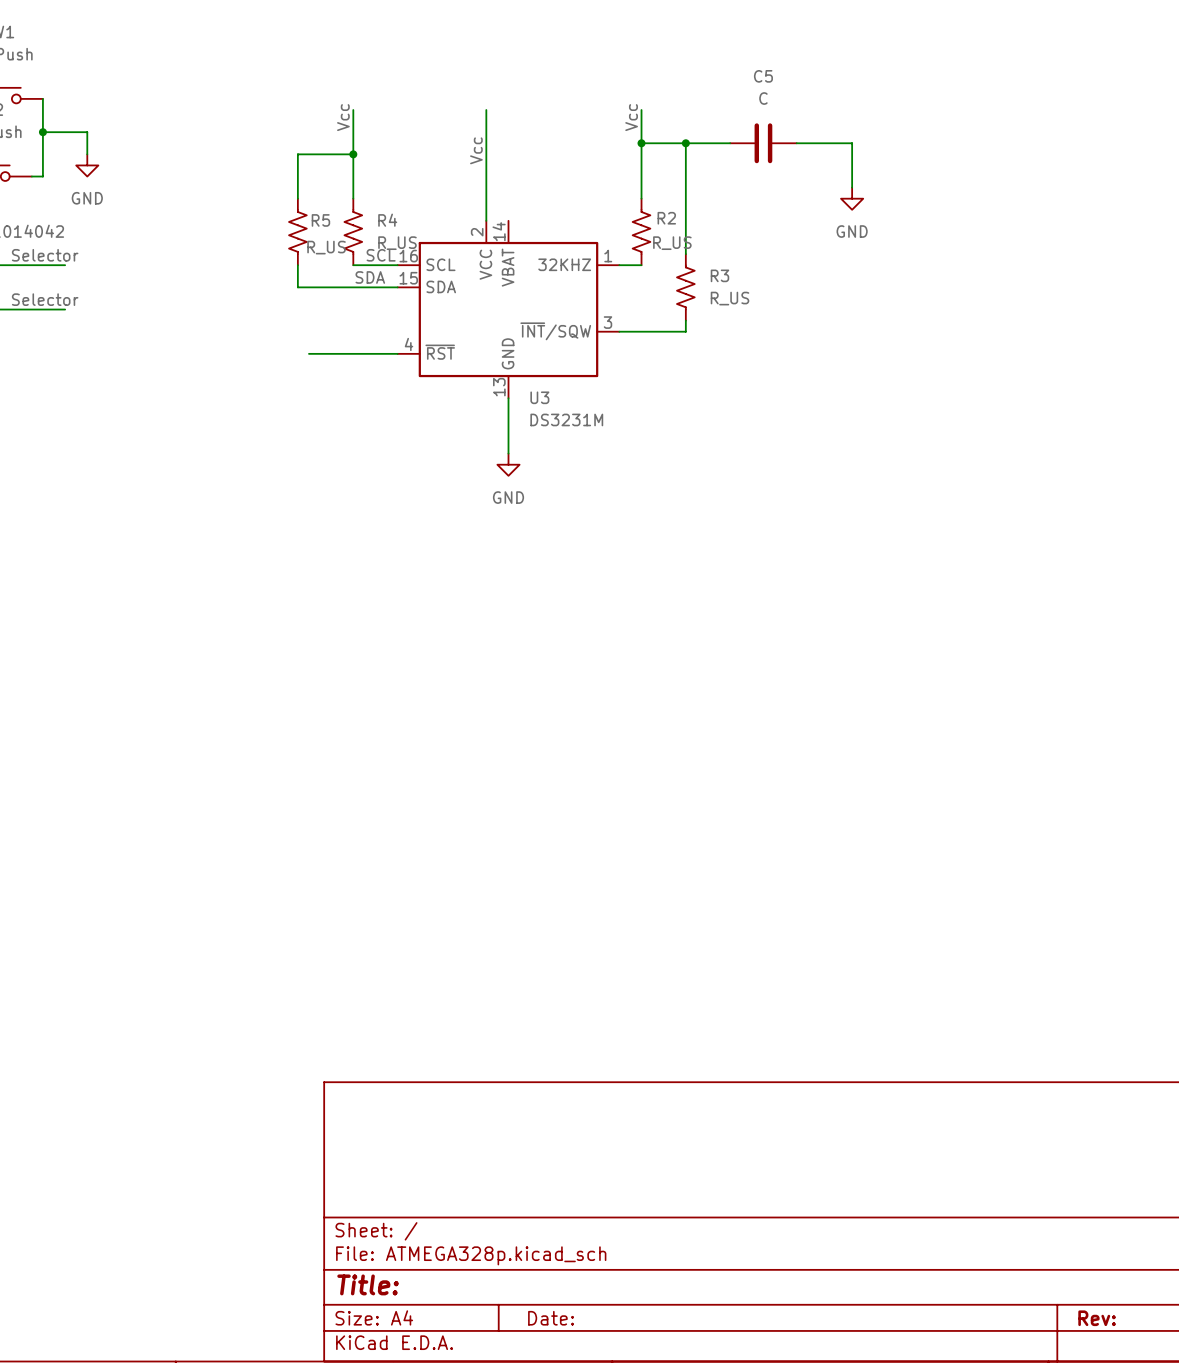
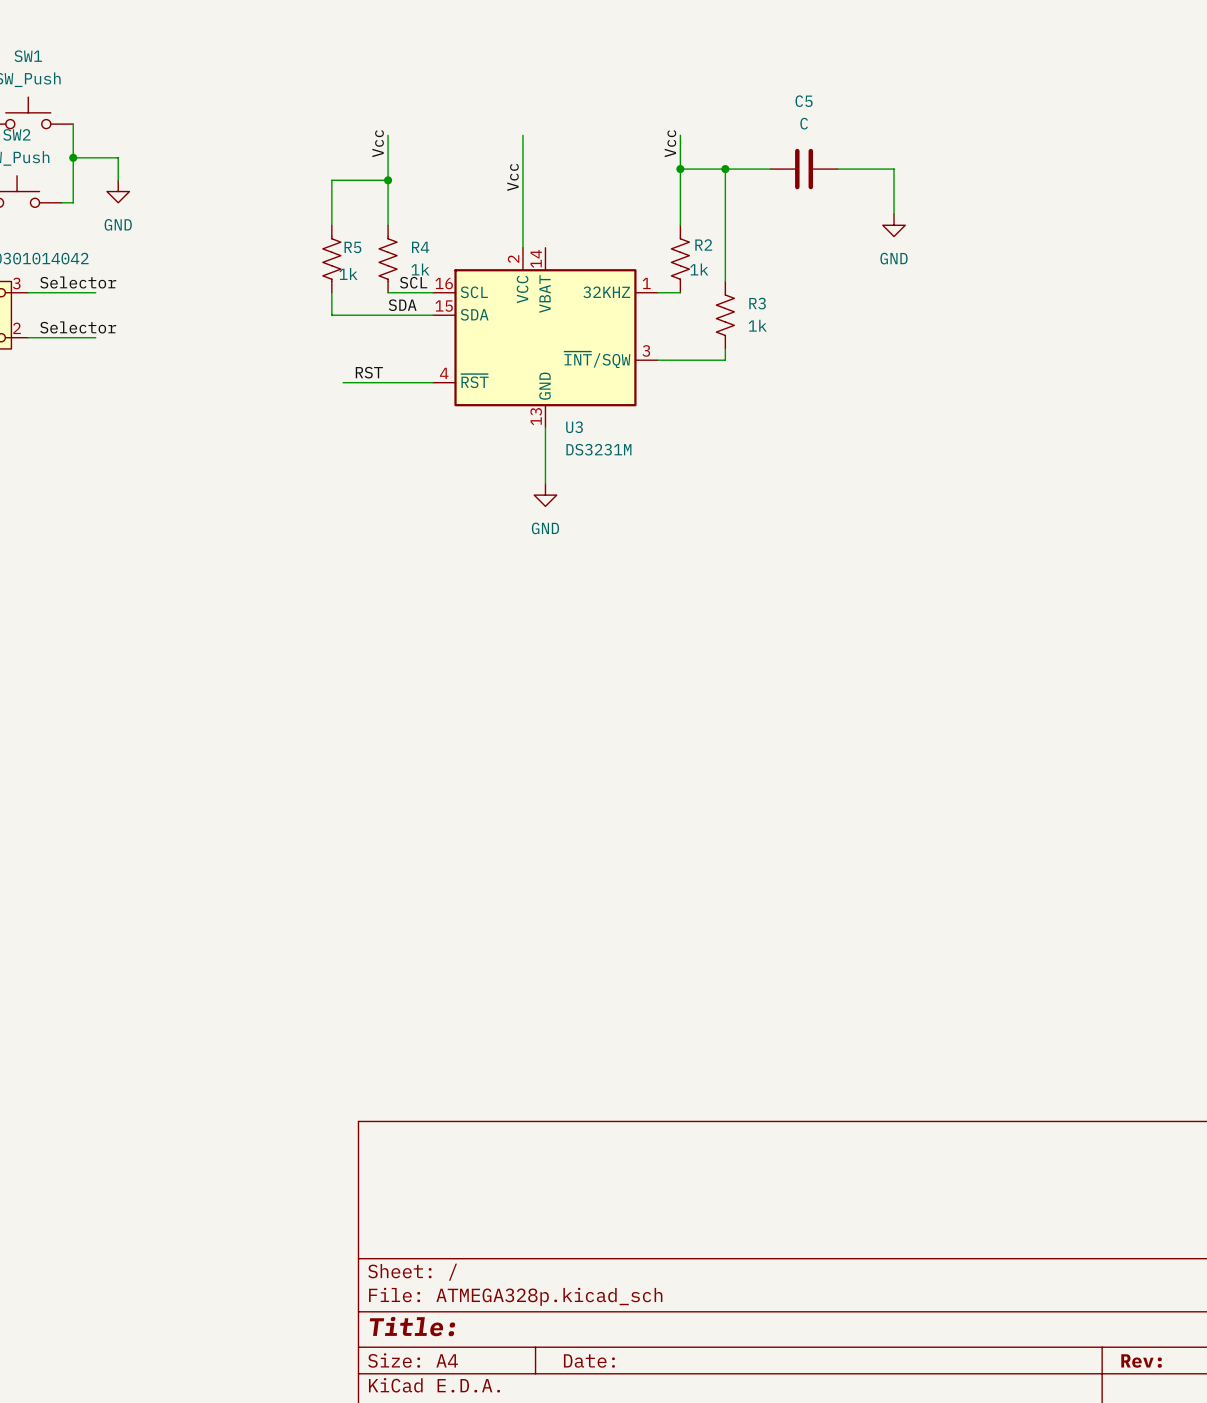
R4 value: R_US (397, 243) -> 1k (420, 269)
R2 value: R_US (672, 243) -> 1k (699, 269)
R5 value: R_US (326, 247) -> 1k (348, 273)
R3 value: R_US (730, 298) -> 1k (757, 325)
label: none -> RST (369, 372)

